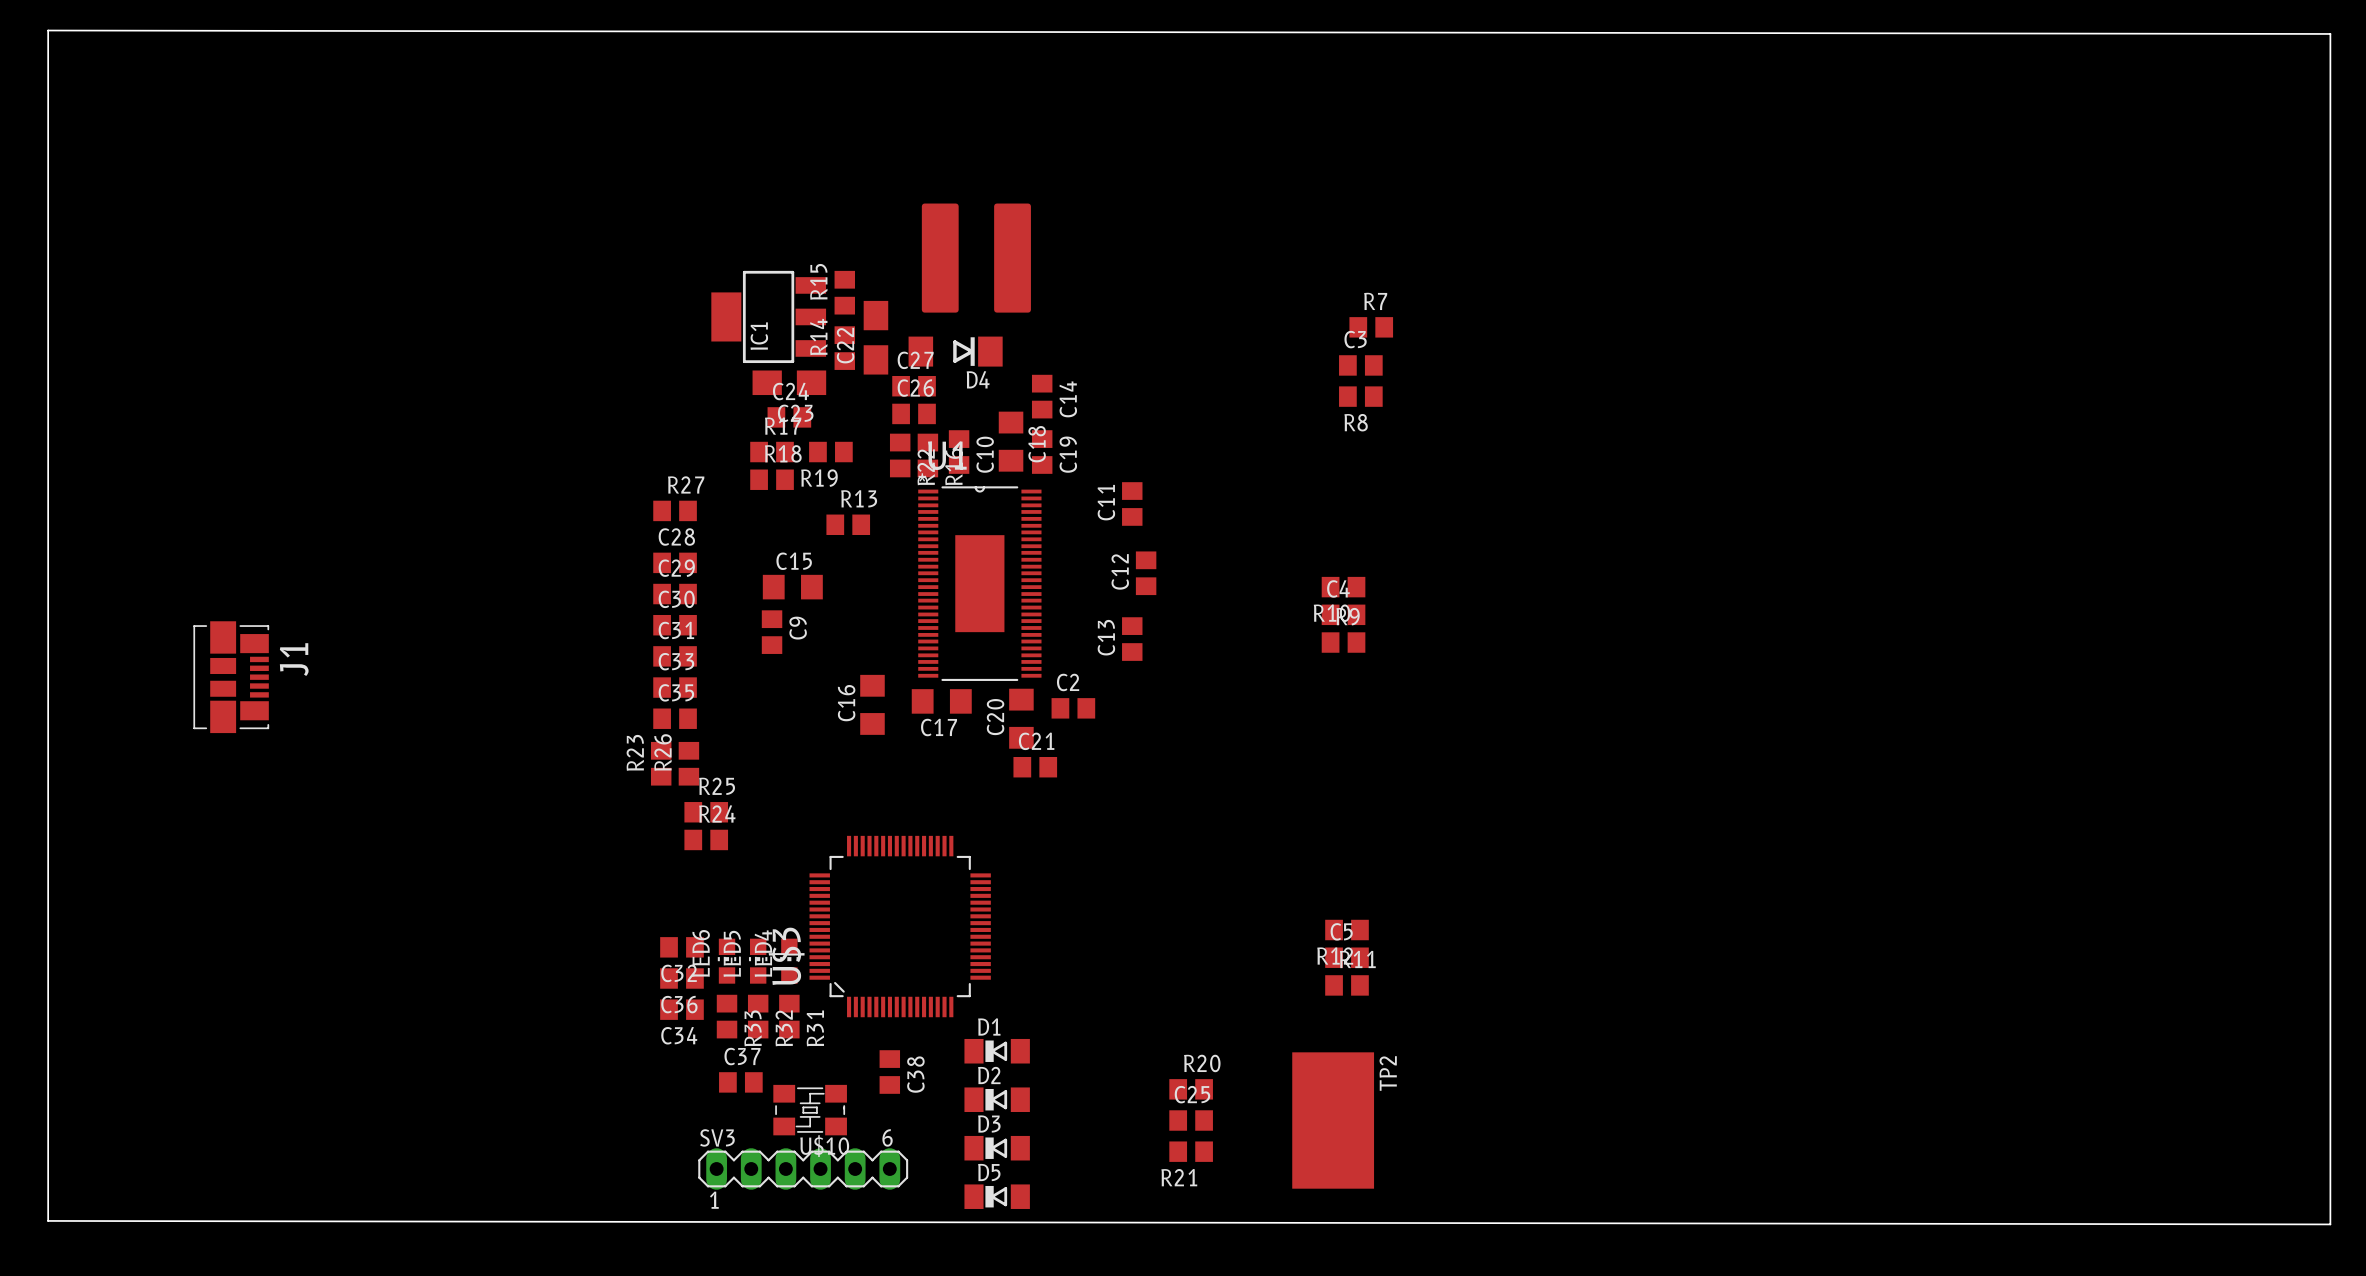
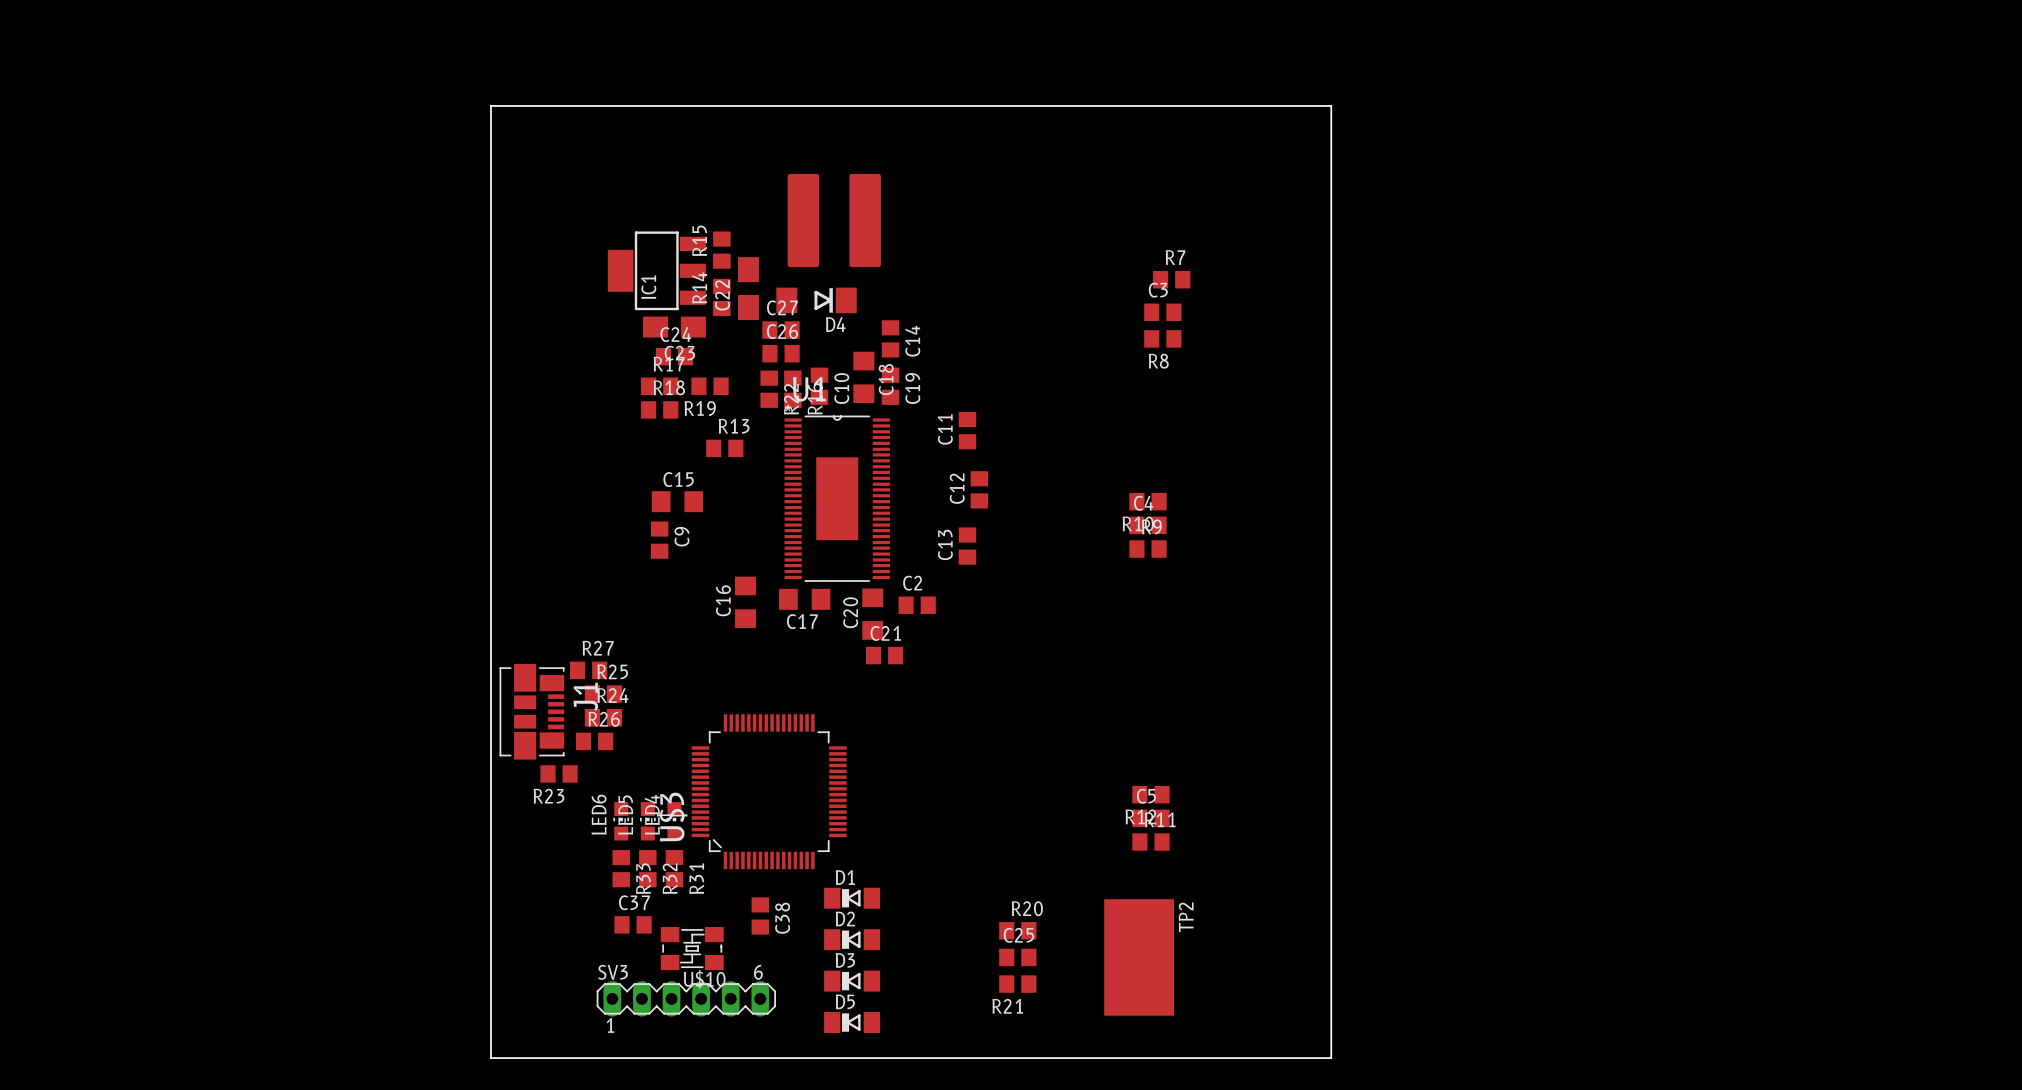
board edge: (48, 30) (2330, 33) (2330, 1224) (48, 1220) (48, 30) -> none
board edge: none -> (490, 105) (1331, 105) (1331, 1058) (490, 1058) (490, 105)
R27 position: (675, 510) -> (588, 670)
C28: (675, 562) -> none
C29: (675, 594) -> none
C30: (675, 625) -> none
C31: (675, 656) -> none
J1 position: (231, 677) -> (532, 711)
C33: (675, 687) -> none
C35: (675, 718) -> none
R23 name position: R23 (635, 752) -> R23 (549, 796)
R23 rotation: 0° (661, 763) -> 90° clockwise (559, 773)
R23 position: (661, 763) -> (559, 773)
R26 rotation: 0° (688, 763) -> 90° clockwise (594, 741)
R26 position: (688, 763) -> (594, 741)
C32: (681, 947) -> none
C36: (681, 978) -> none
C34: (681, 1009) -> none

